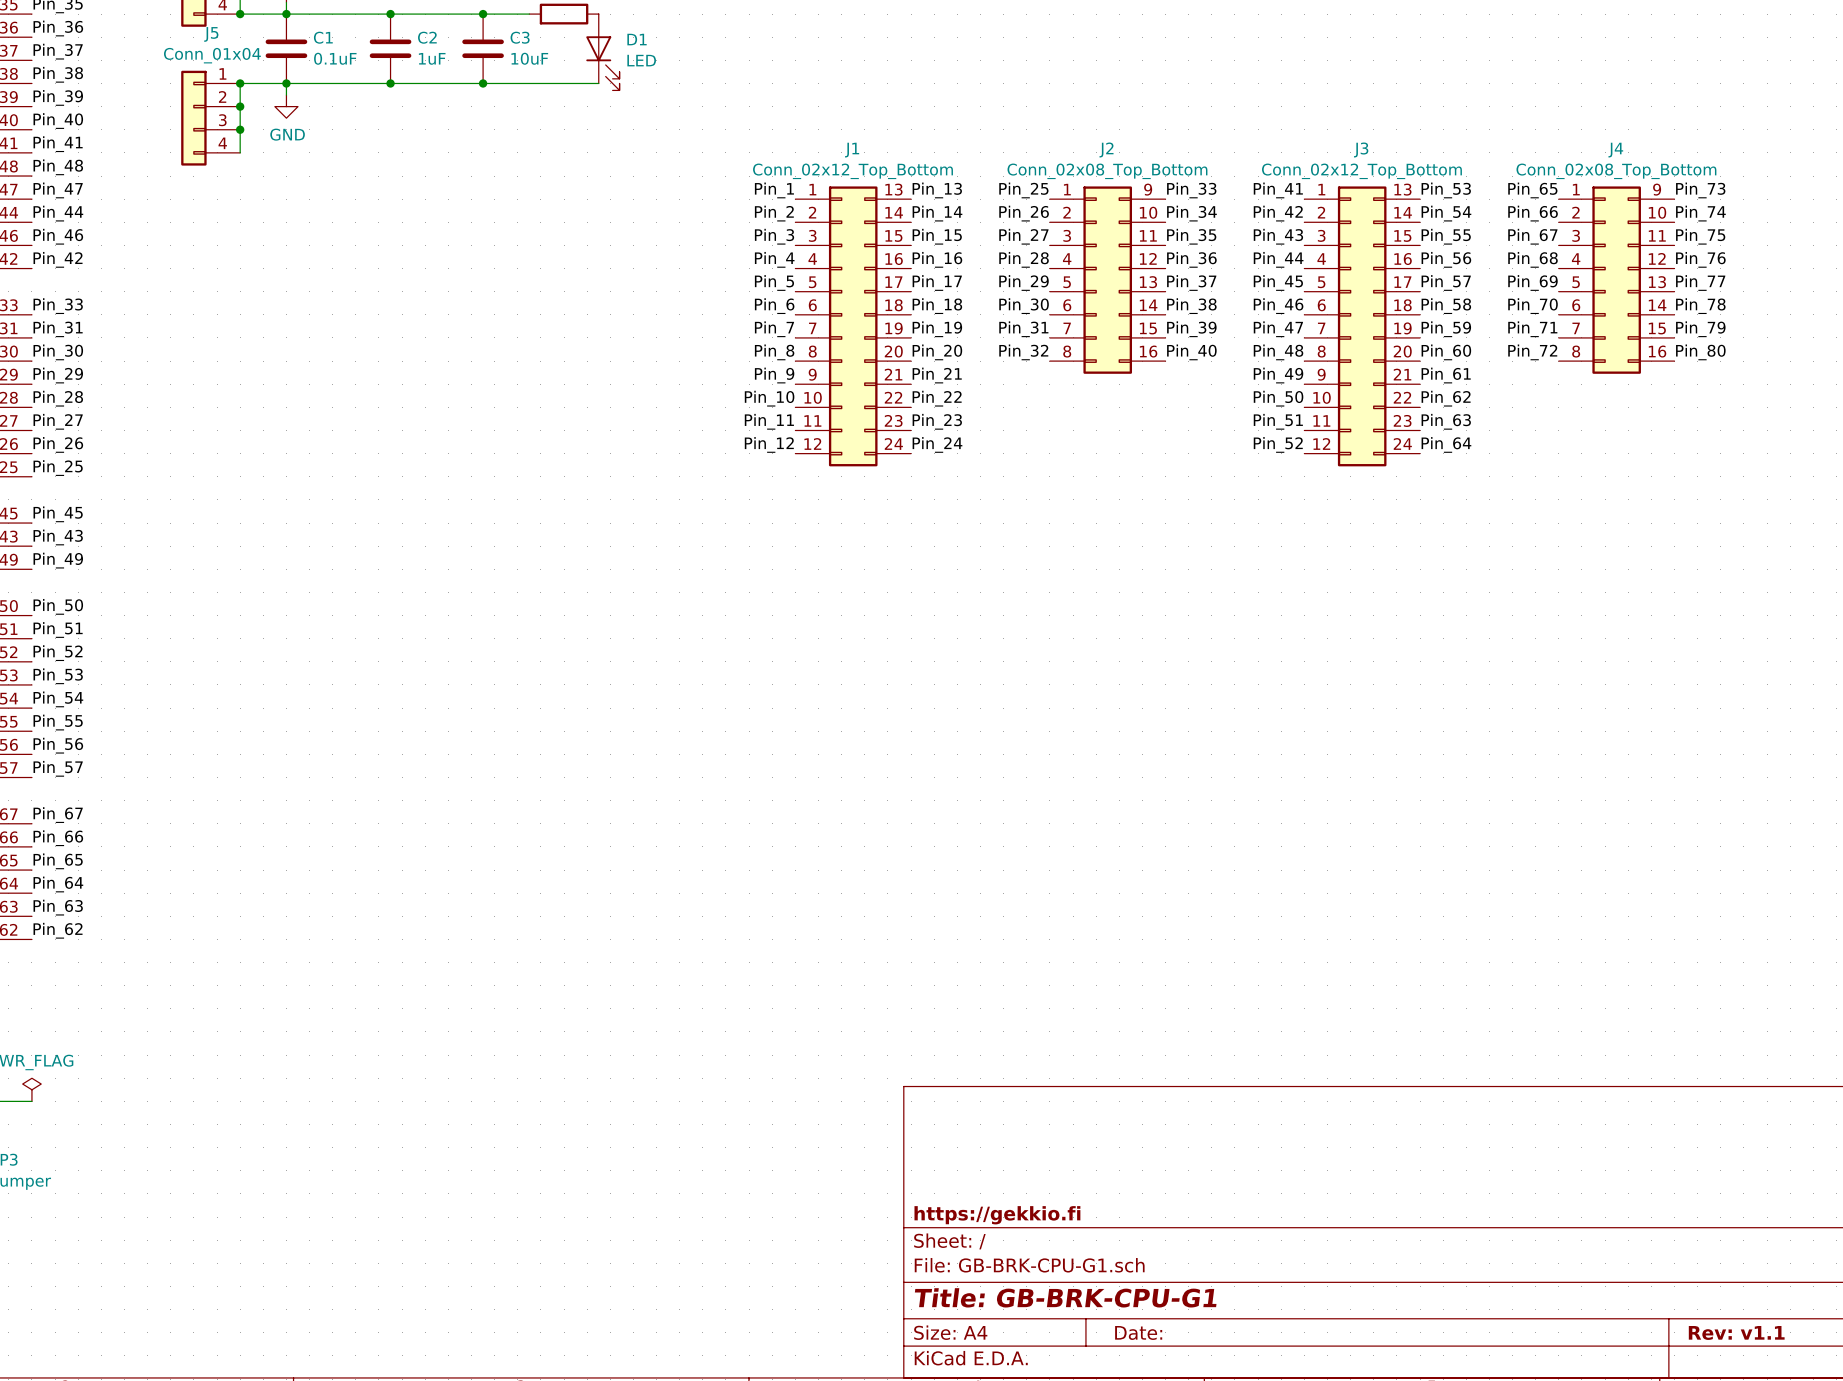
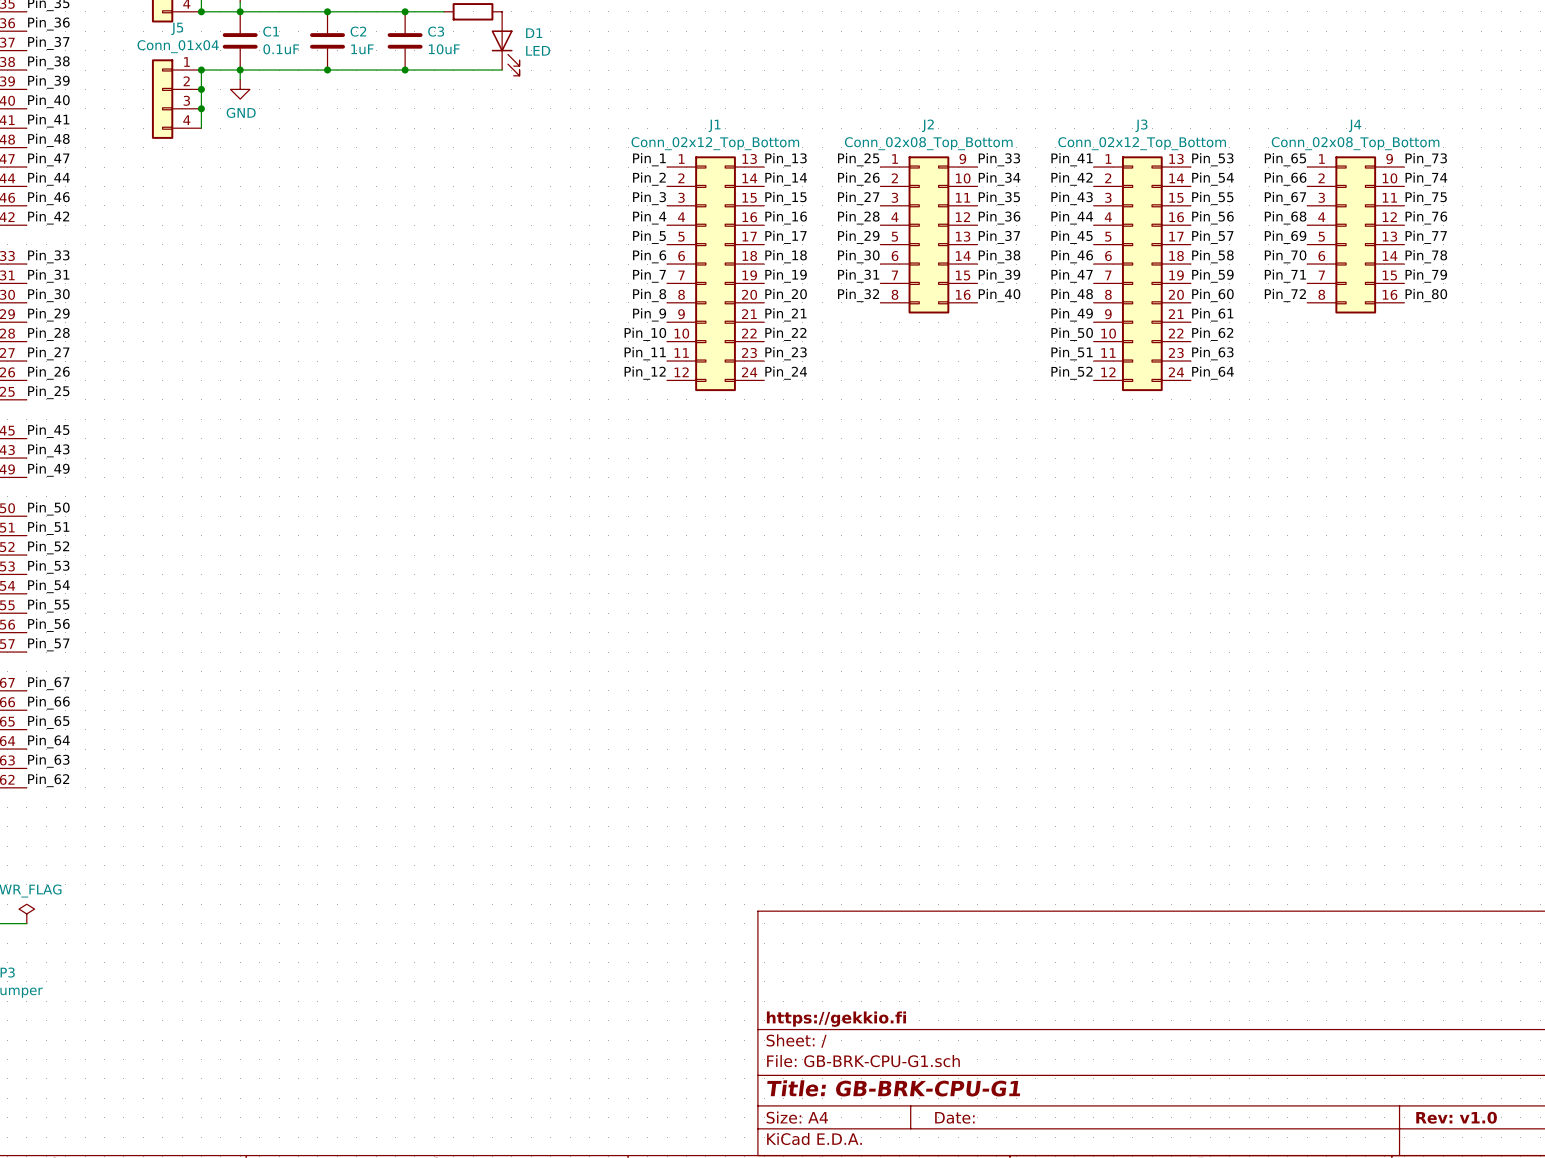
title block: Rev: v1.1 (1736, 1332) -> Rev: v1.0 (1456, 1117)

